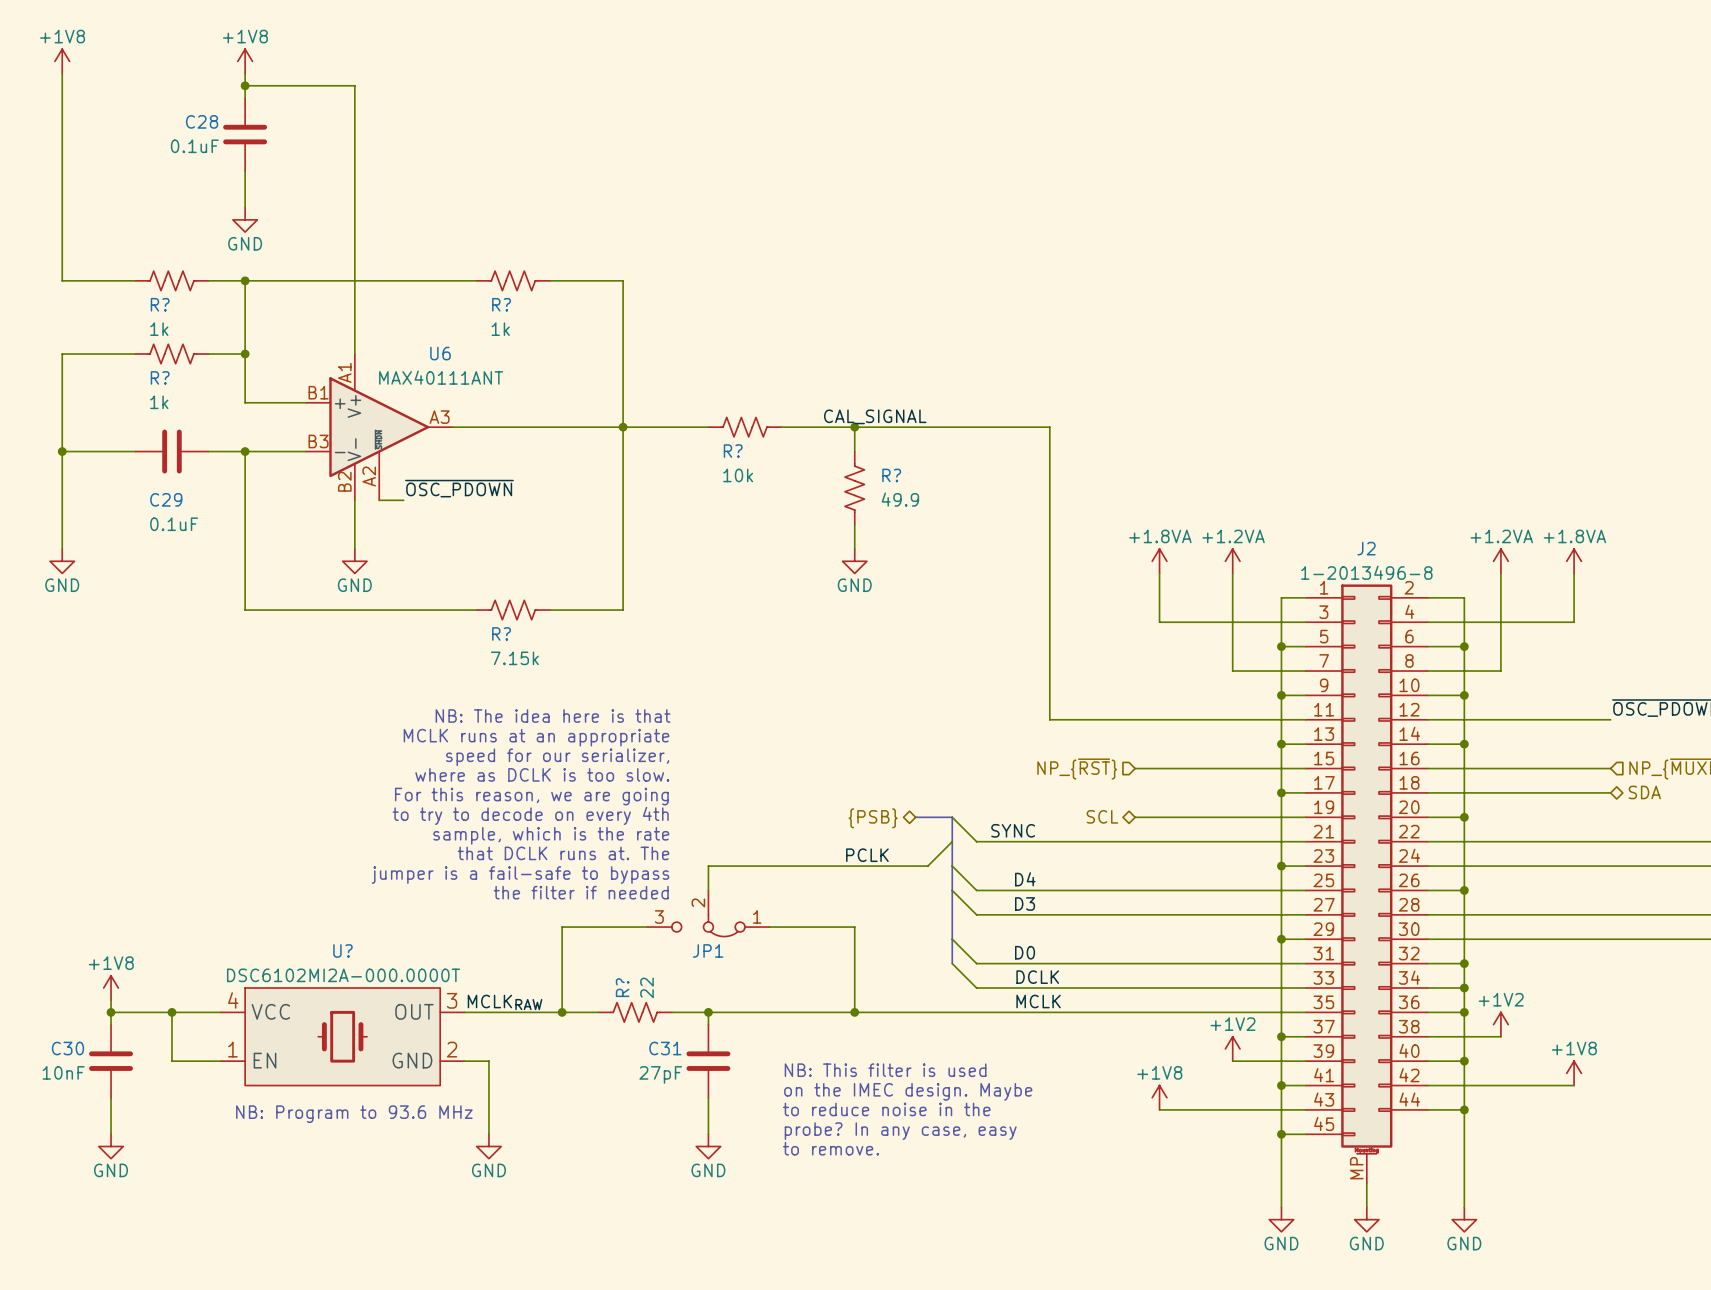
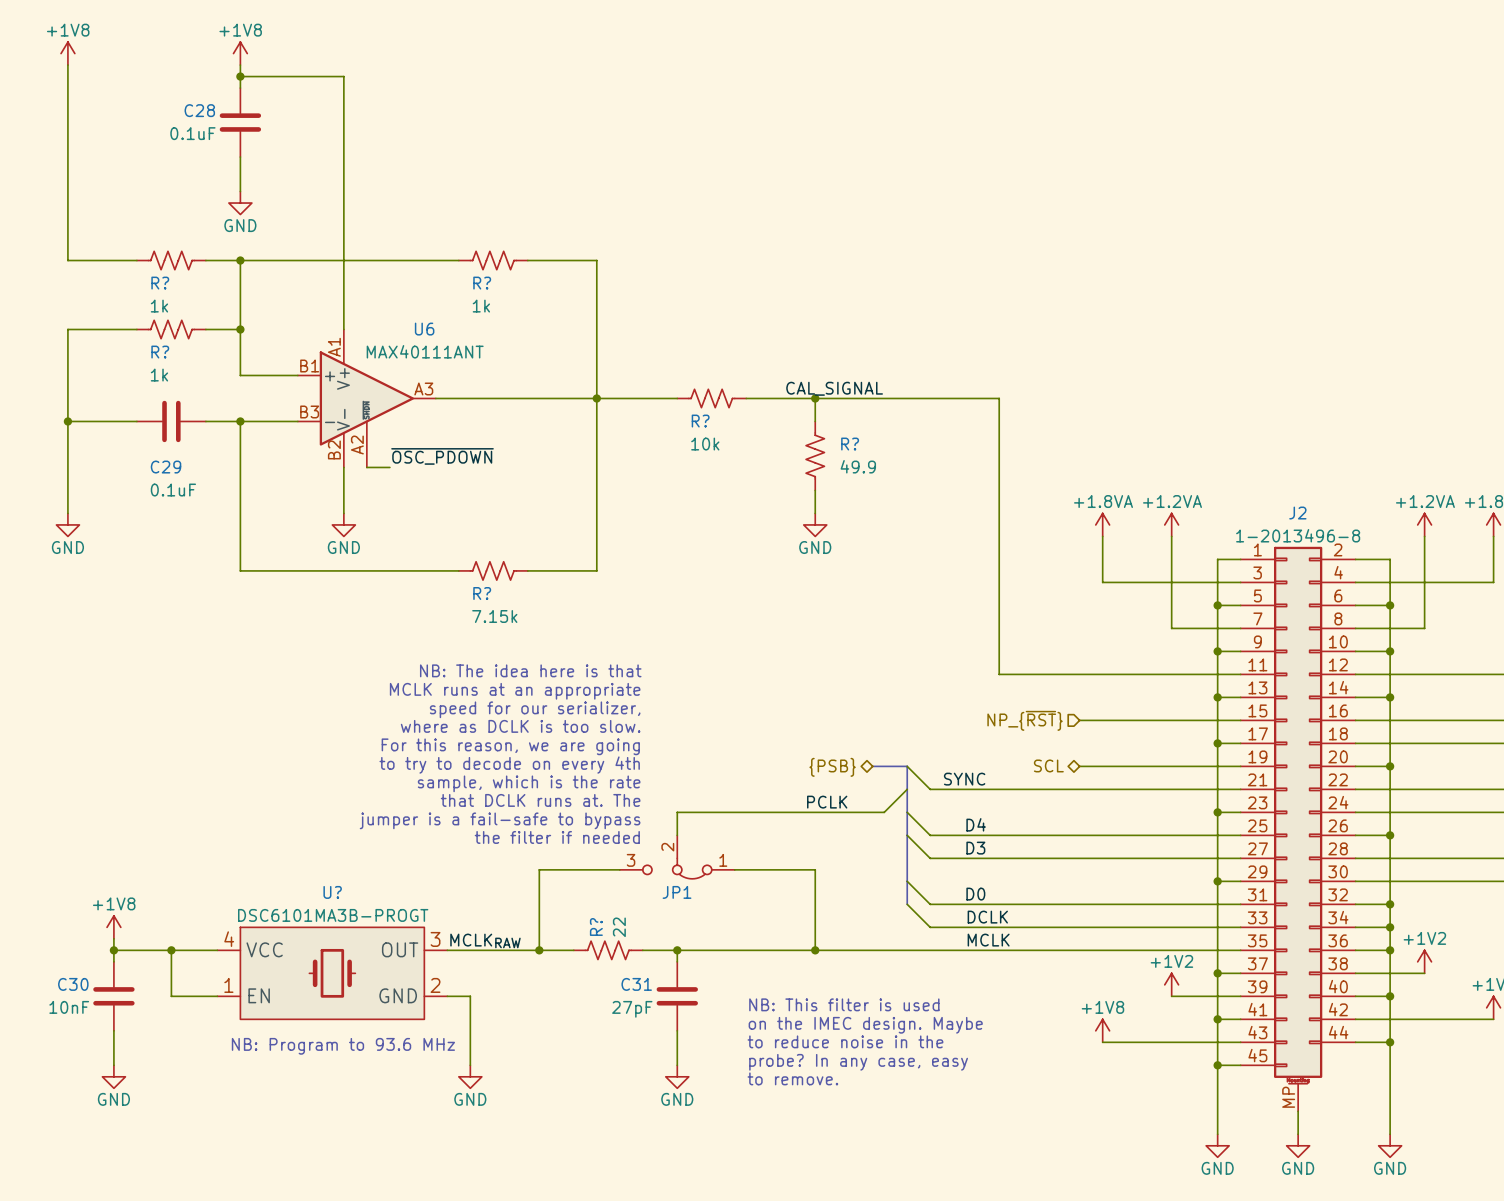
U? value: DSC6102MI2A-000.0000T (343, 975) -> DSC6101MA3B-PROGT (333, 915)

